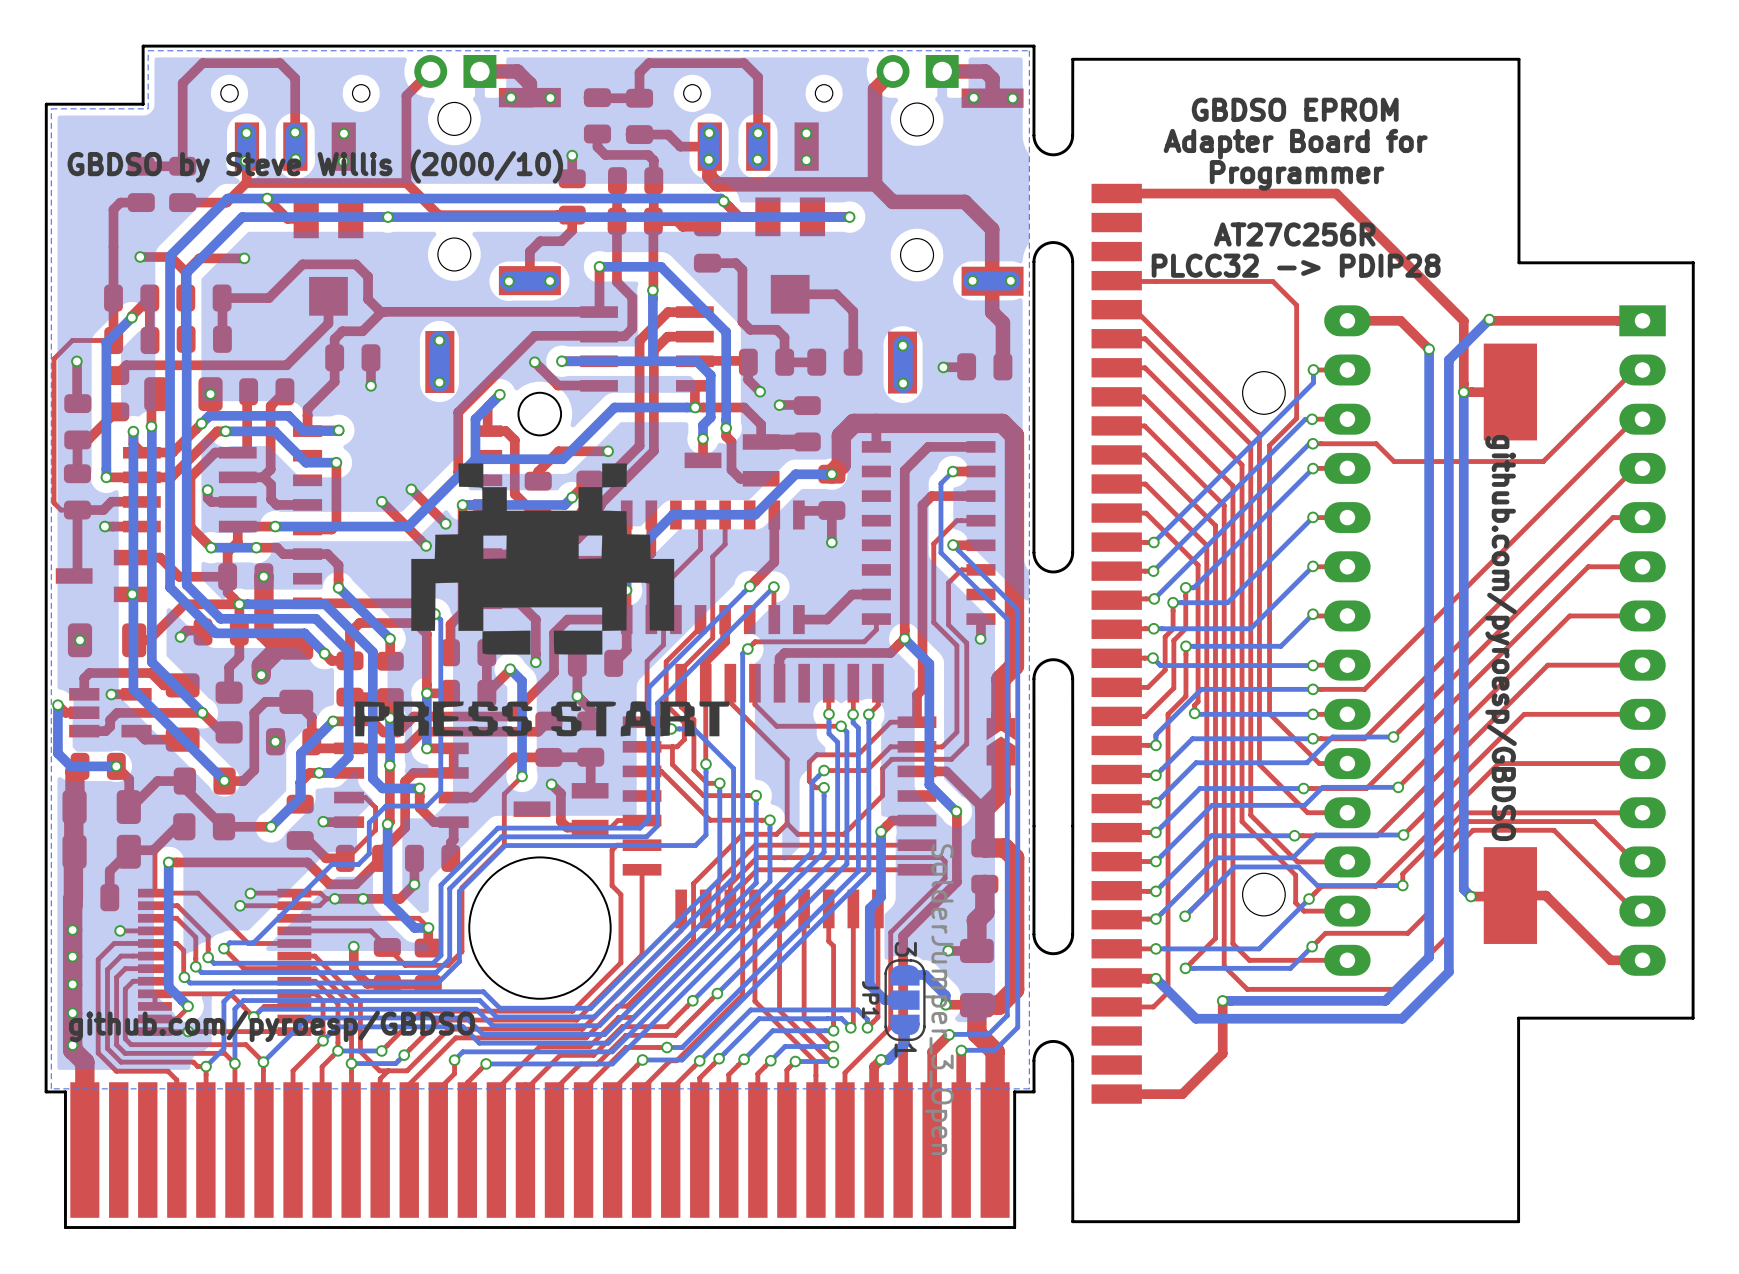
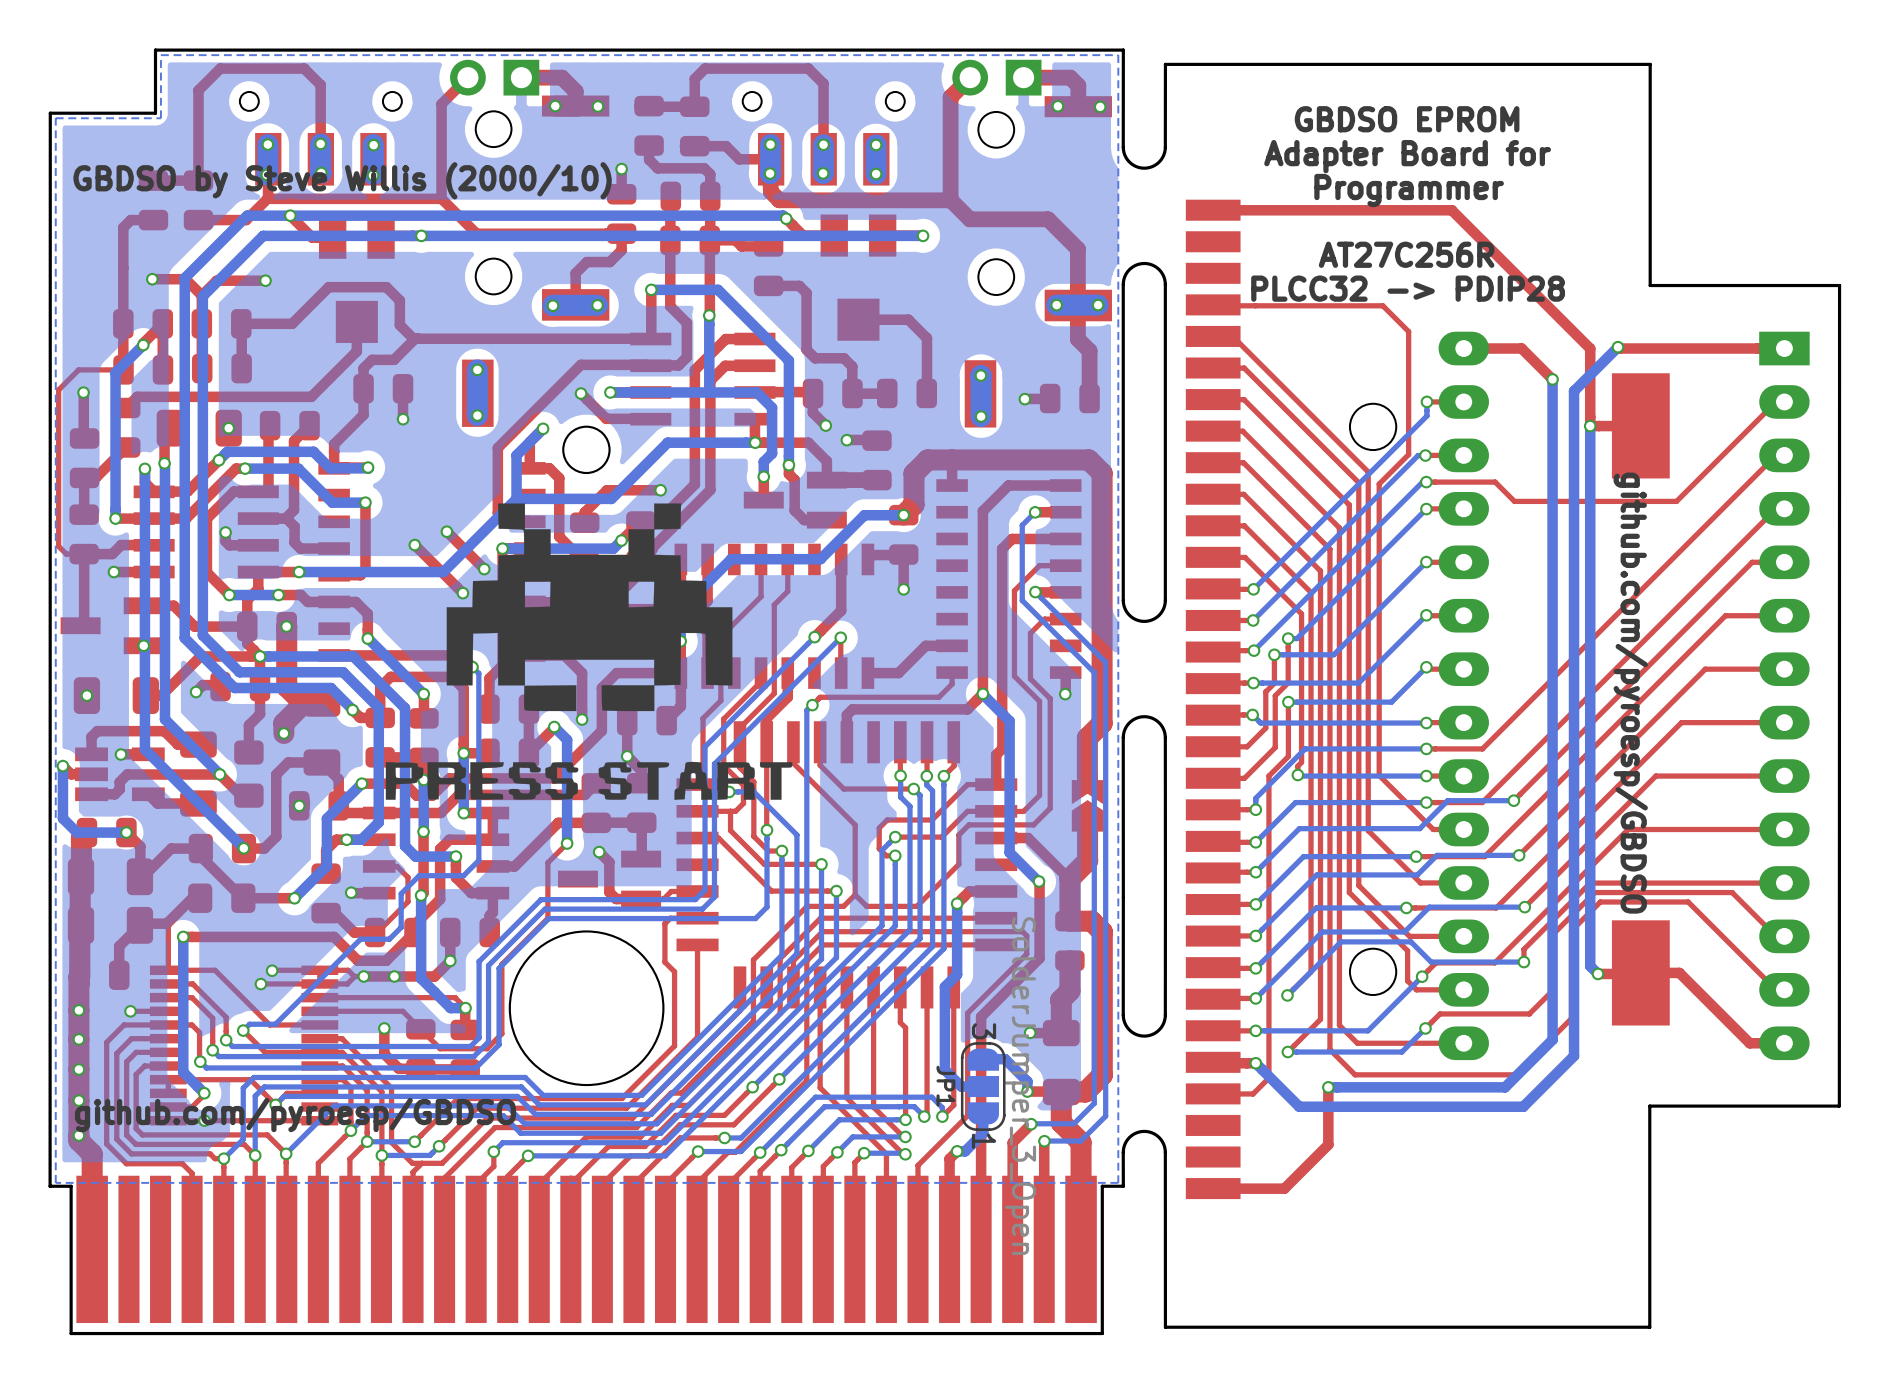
bottom track: none -> (373, 144) (373, 174)
bottom track: none -> (876, 144) (876, 174)

